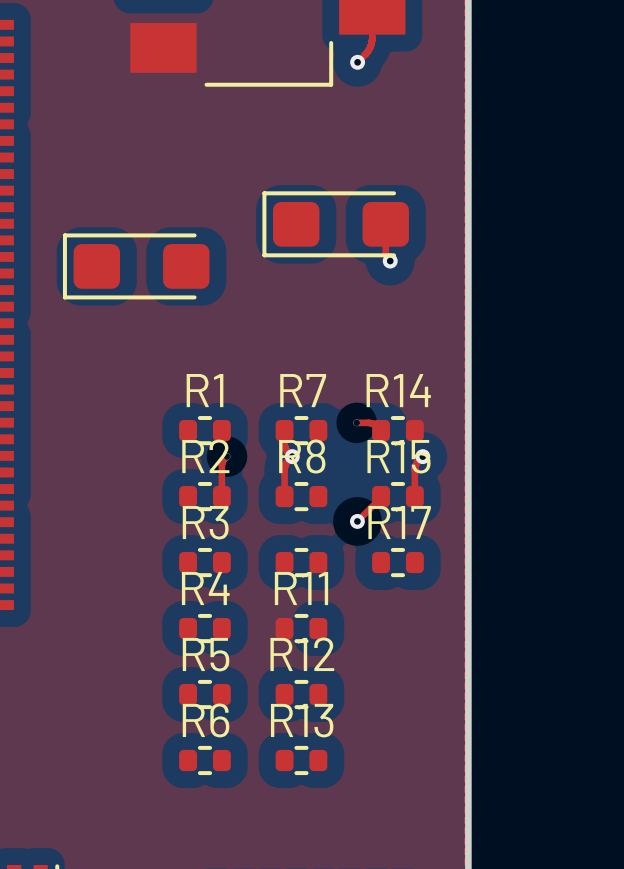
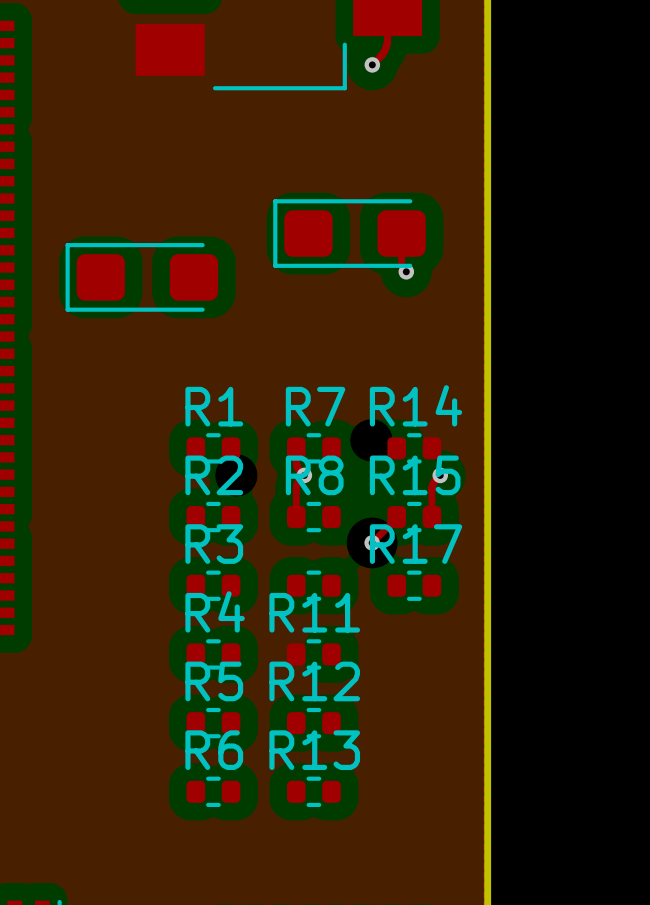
top track: (356, 422) (372, 423) (381, 430) -> none
via: (356, 422) -> none
top track: (227, 456) (221, 464) (221, 496) -> none
via: (227, 456) -> none

